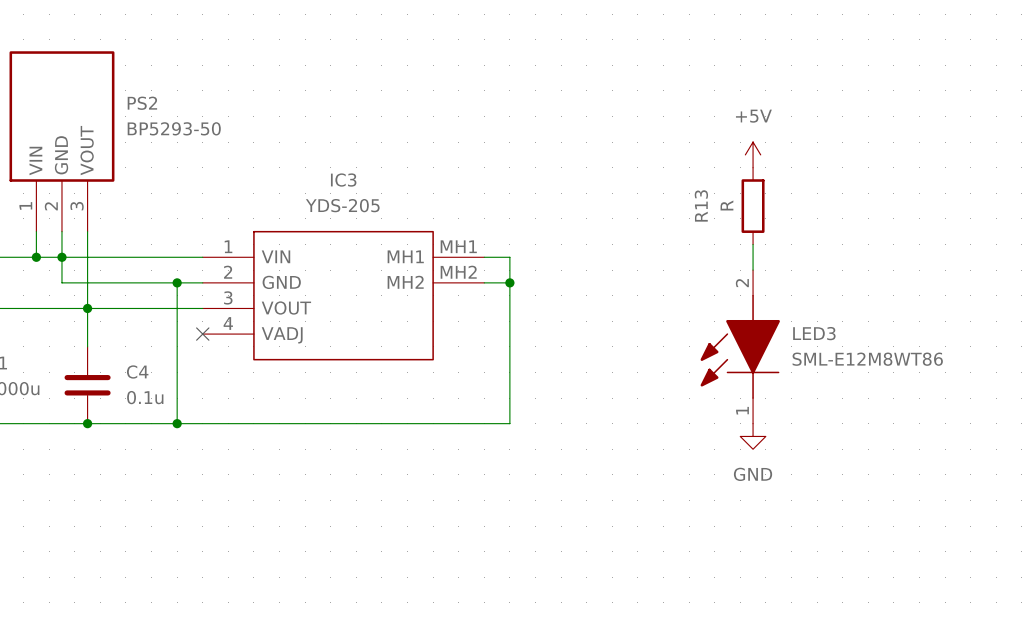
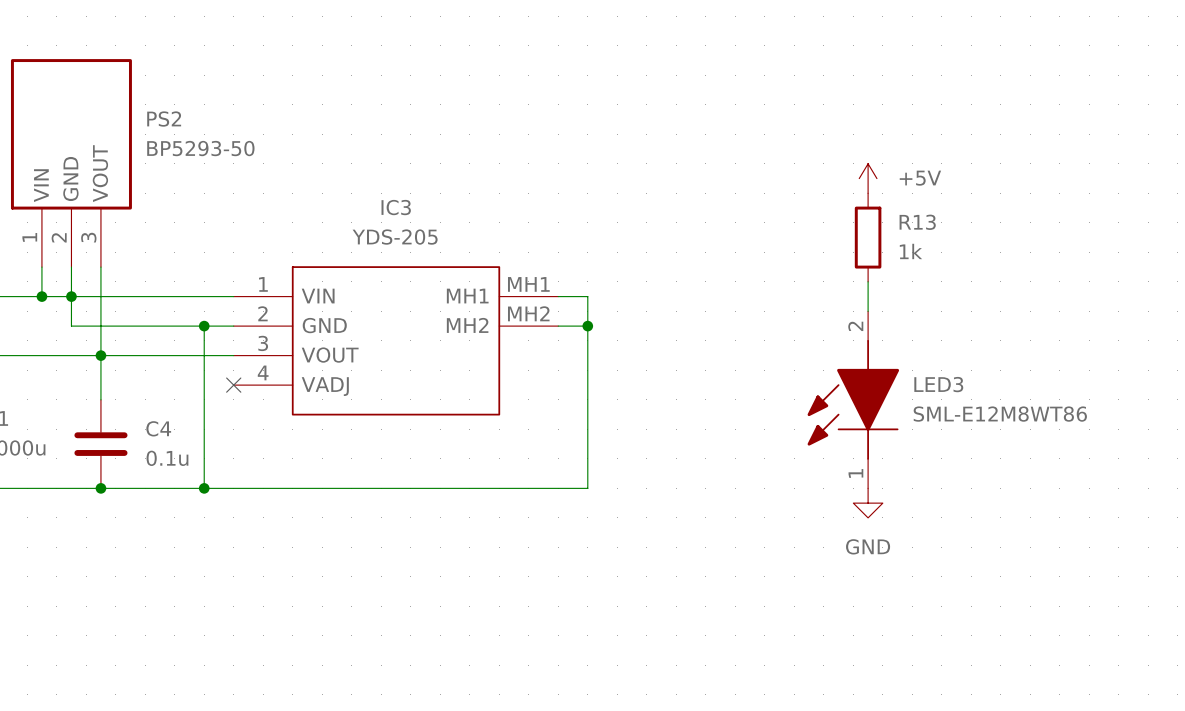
power symbol text position: +5V (753, 116) -> +5V (920, 178)
R13 name rotation: 0° (701, 205) -> 90° clockwise (917, 222)
R13 name position: R13 (701, 205) -> R13 (917, 222)
R13 value: R (726, 205) -> 1k (910, 251)

